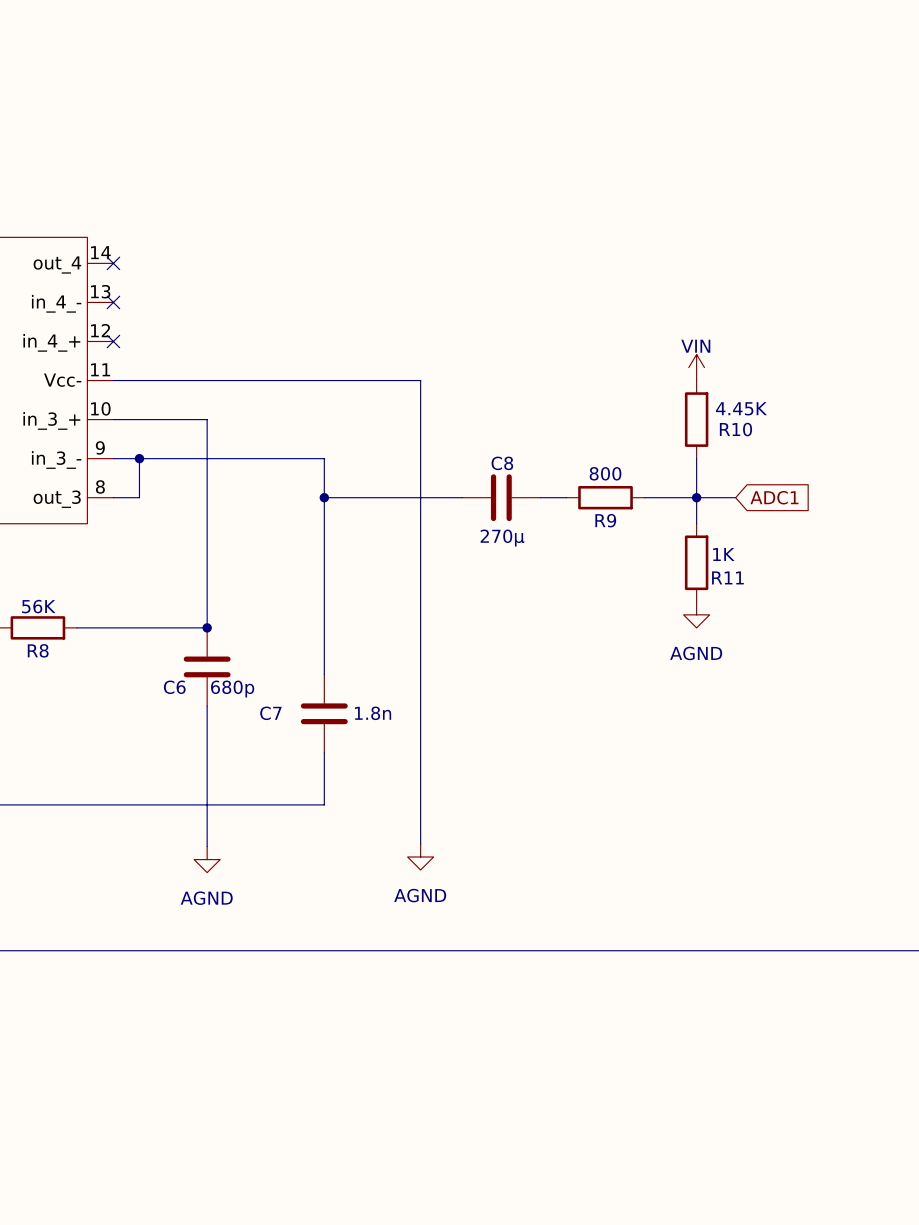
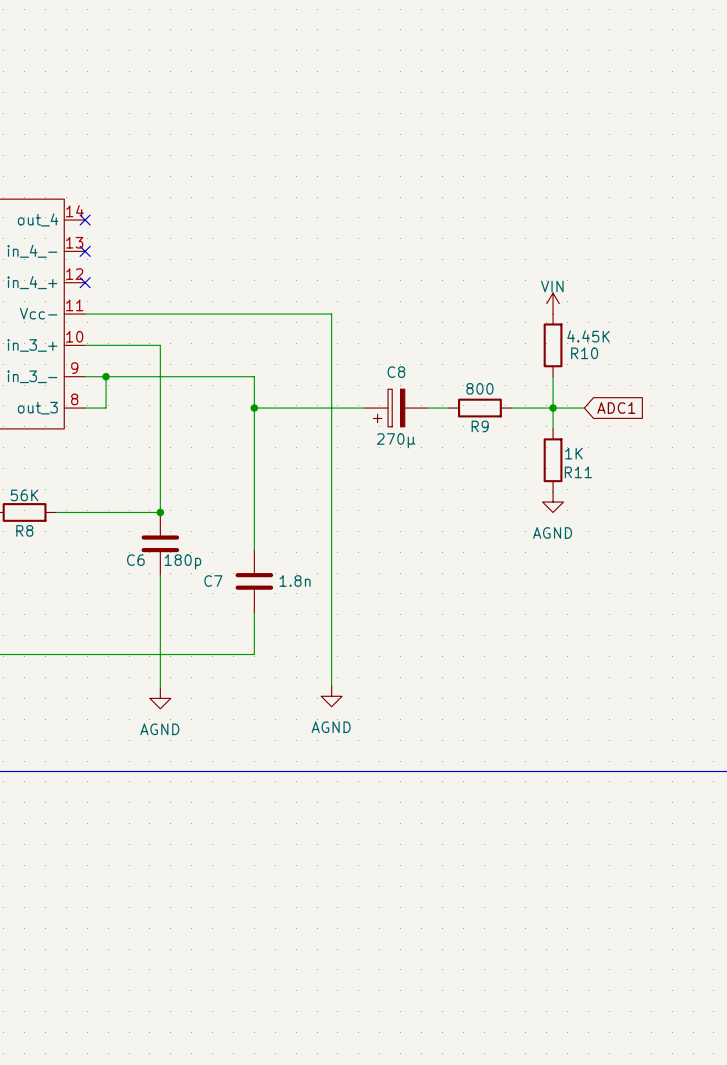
C8 symbol: [462, 474, 541, 522] -> [365, 389, 428, 427]
C6 value: 680p (232, 689) -> 180p (182, 561)

